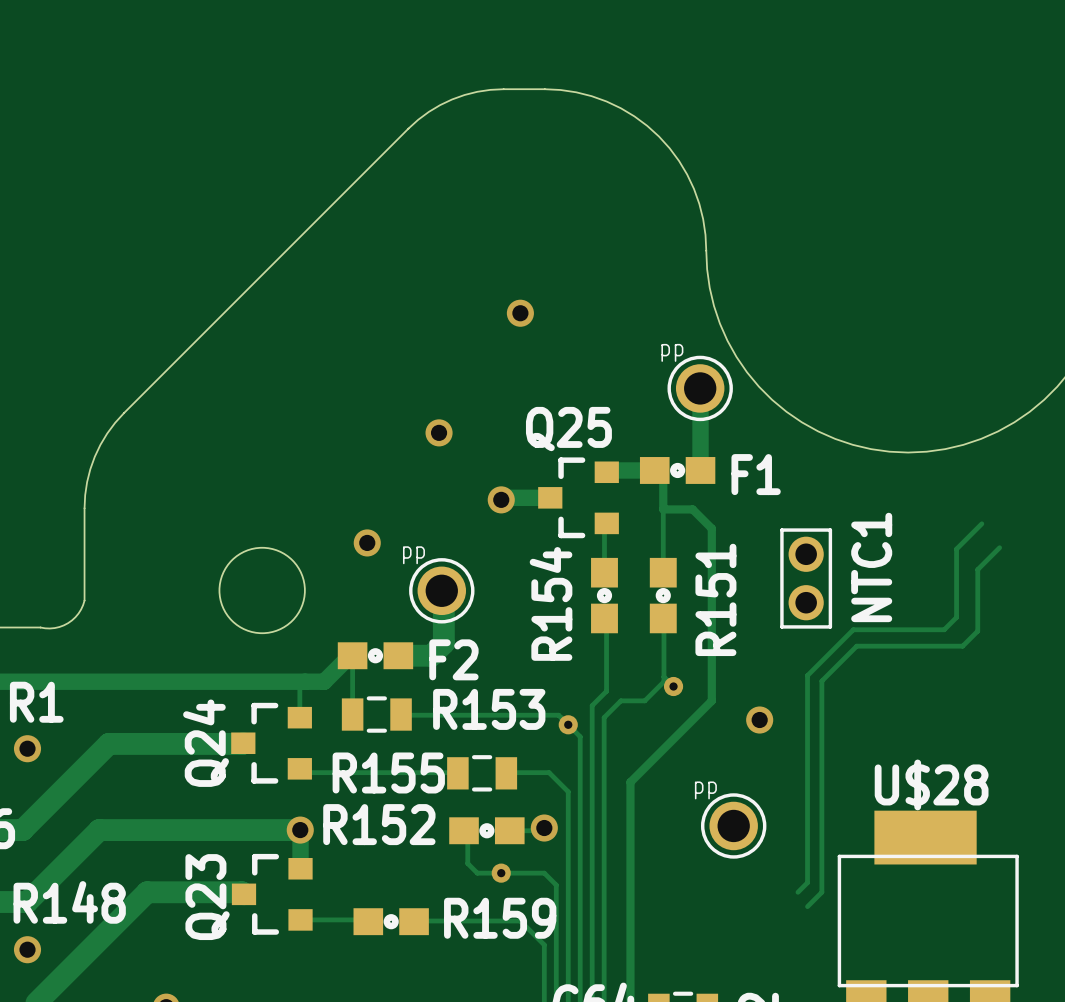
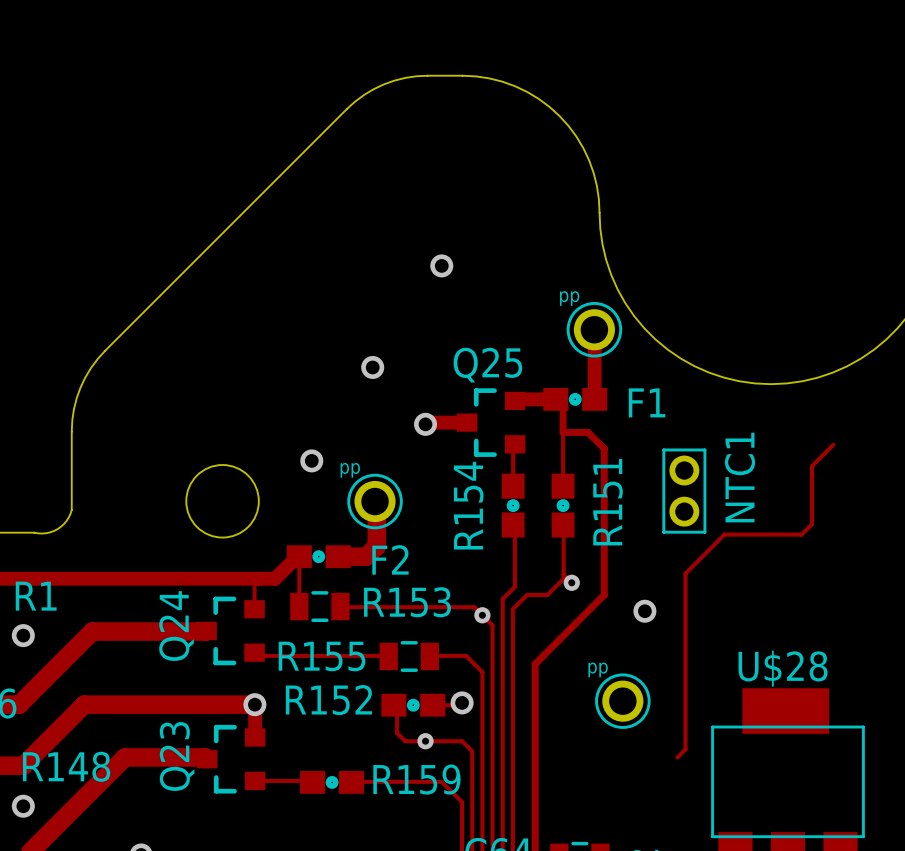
track: (999, 547) (977, 569) (977, 631) (962, 646) (856, 646) (821, 681) (821, 892) (807, 906) -> none

